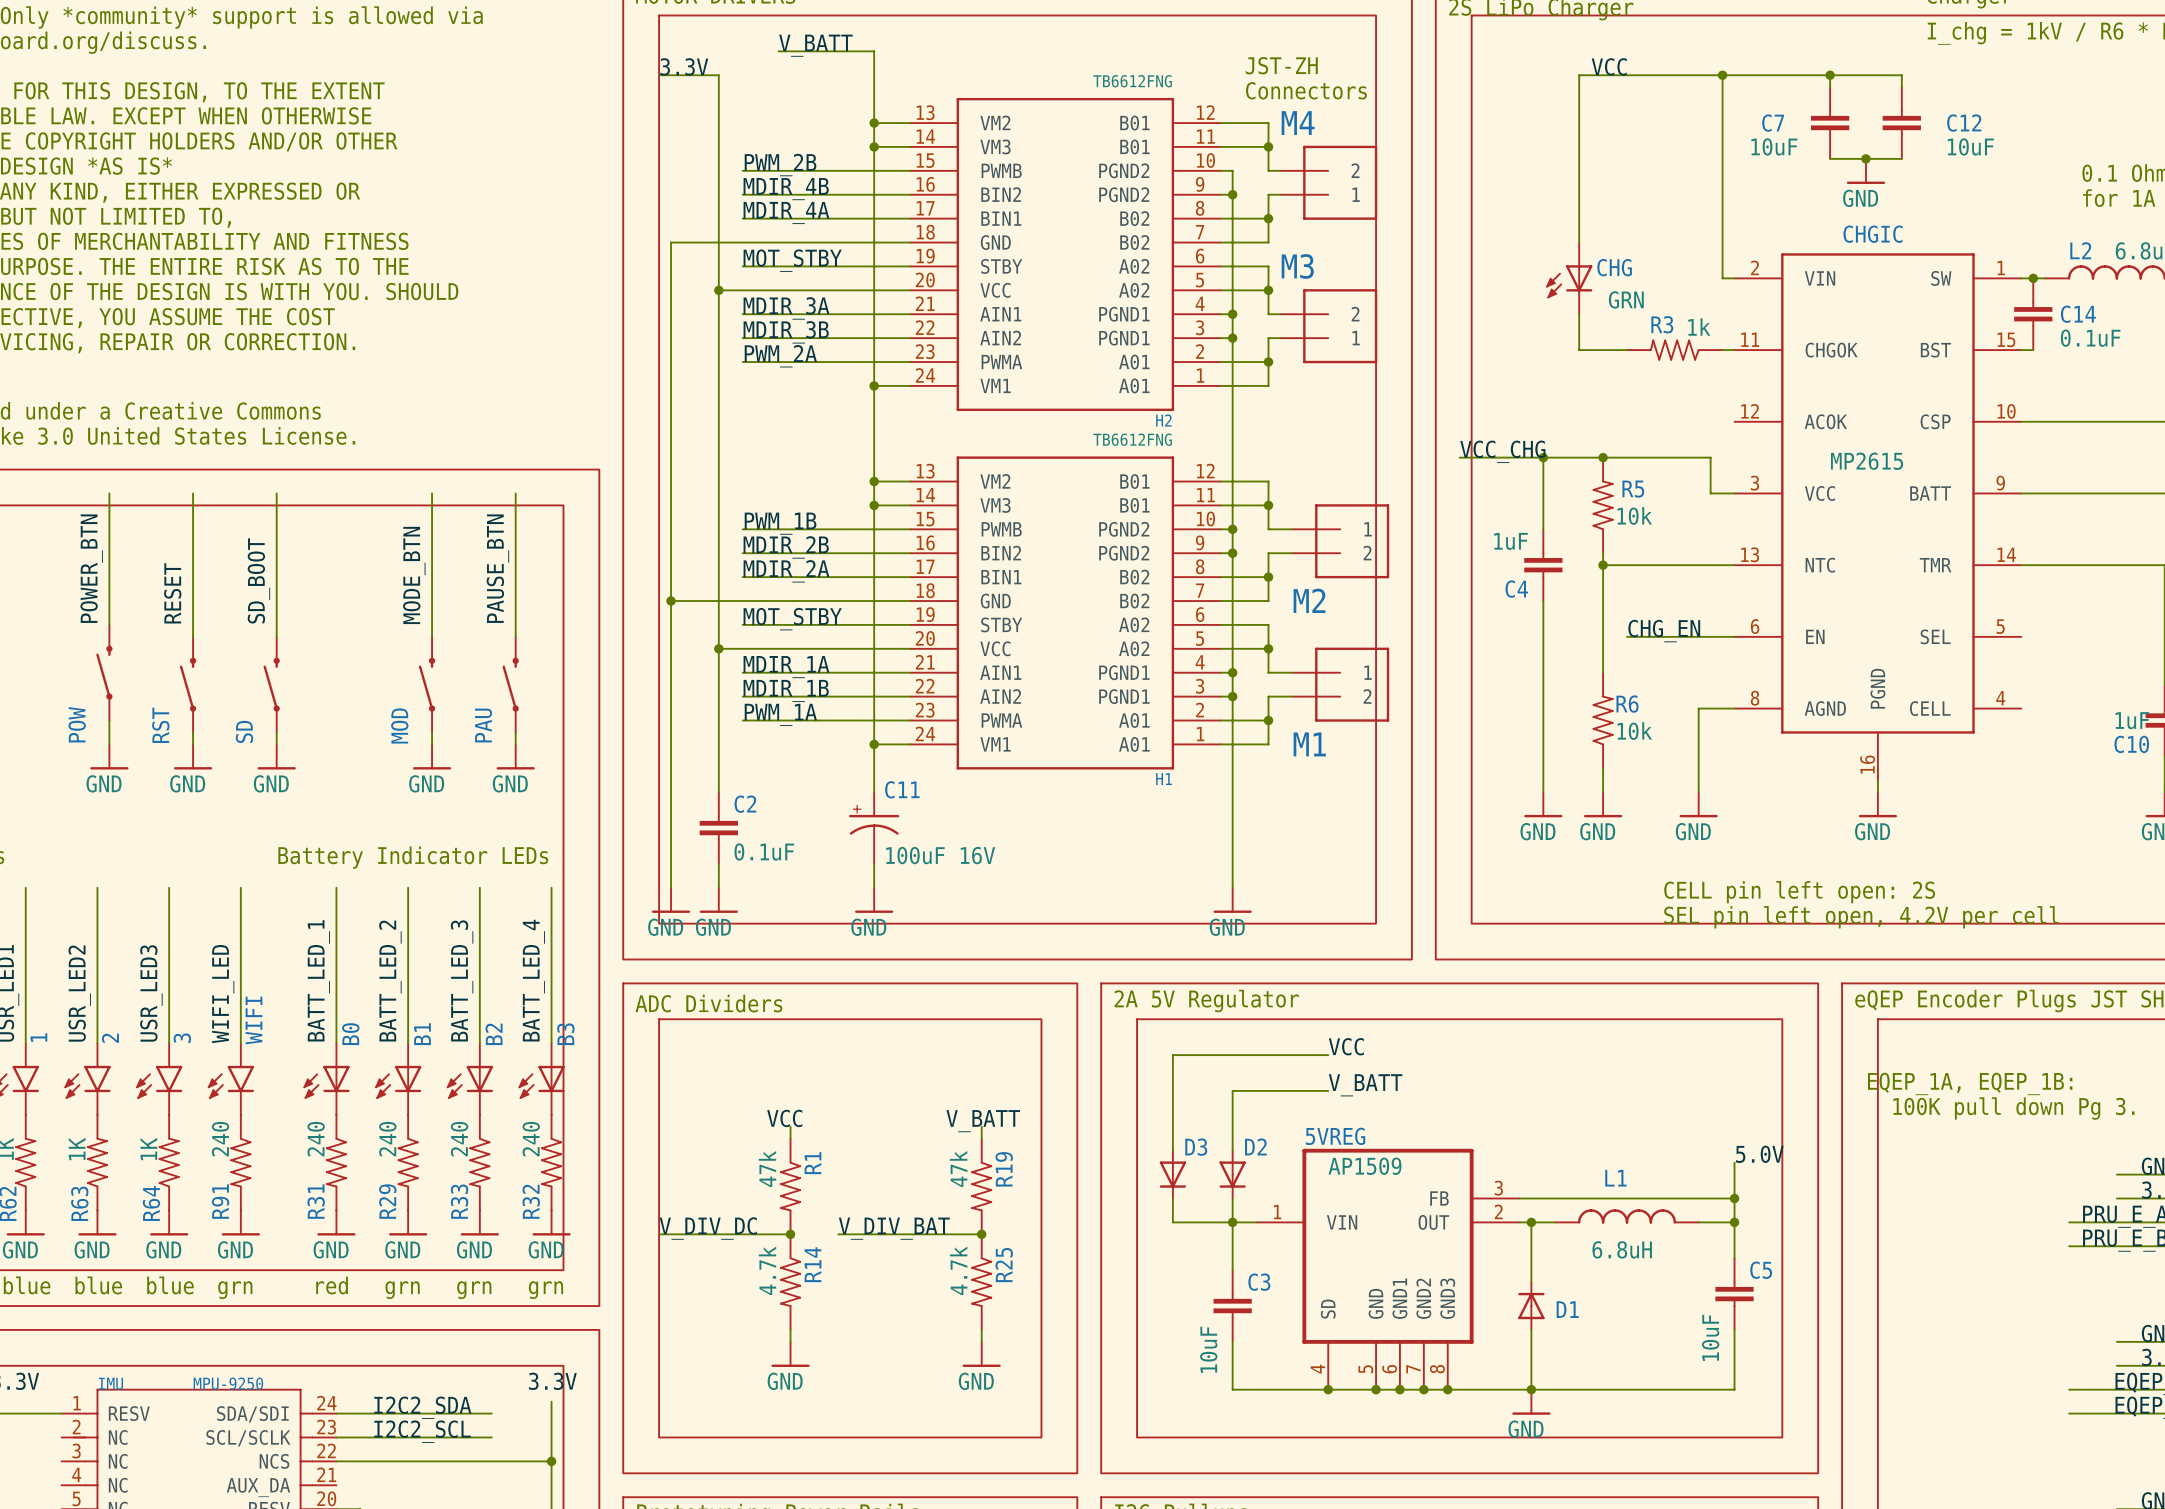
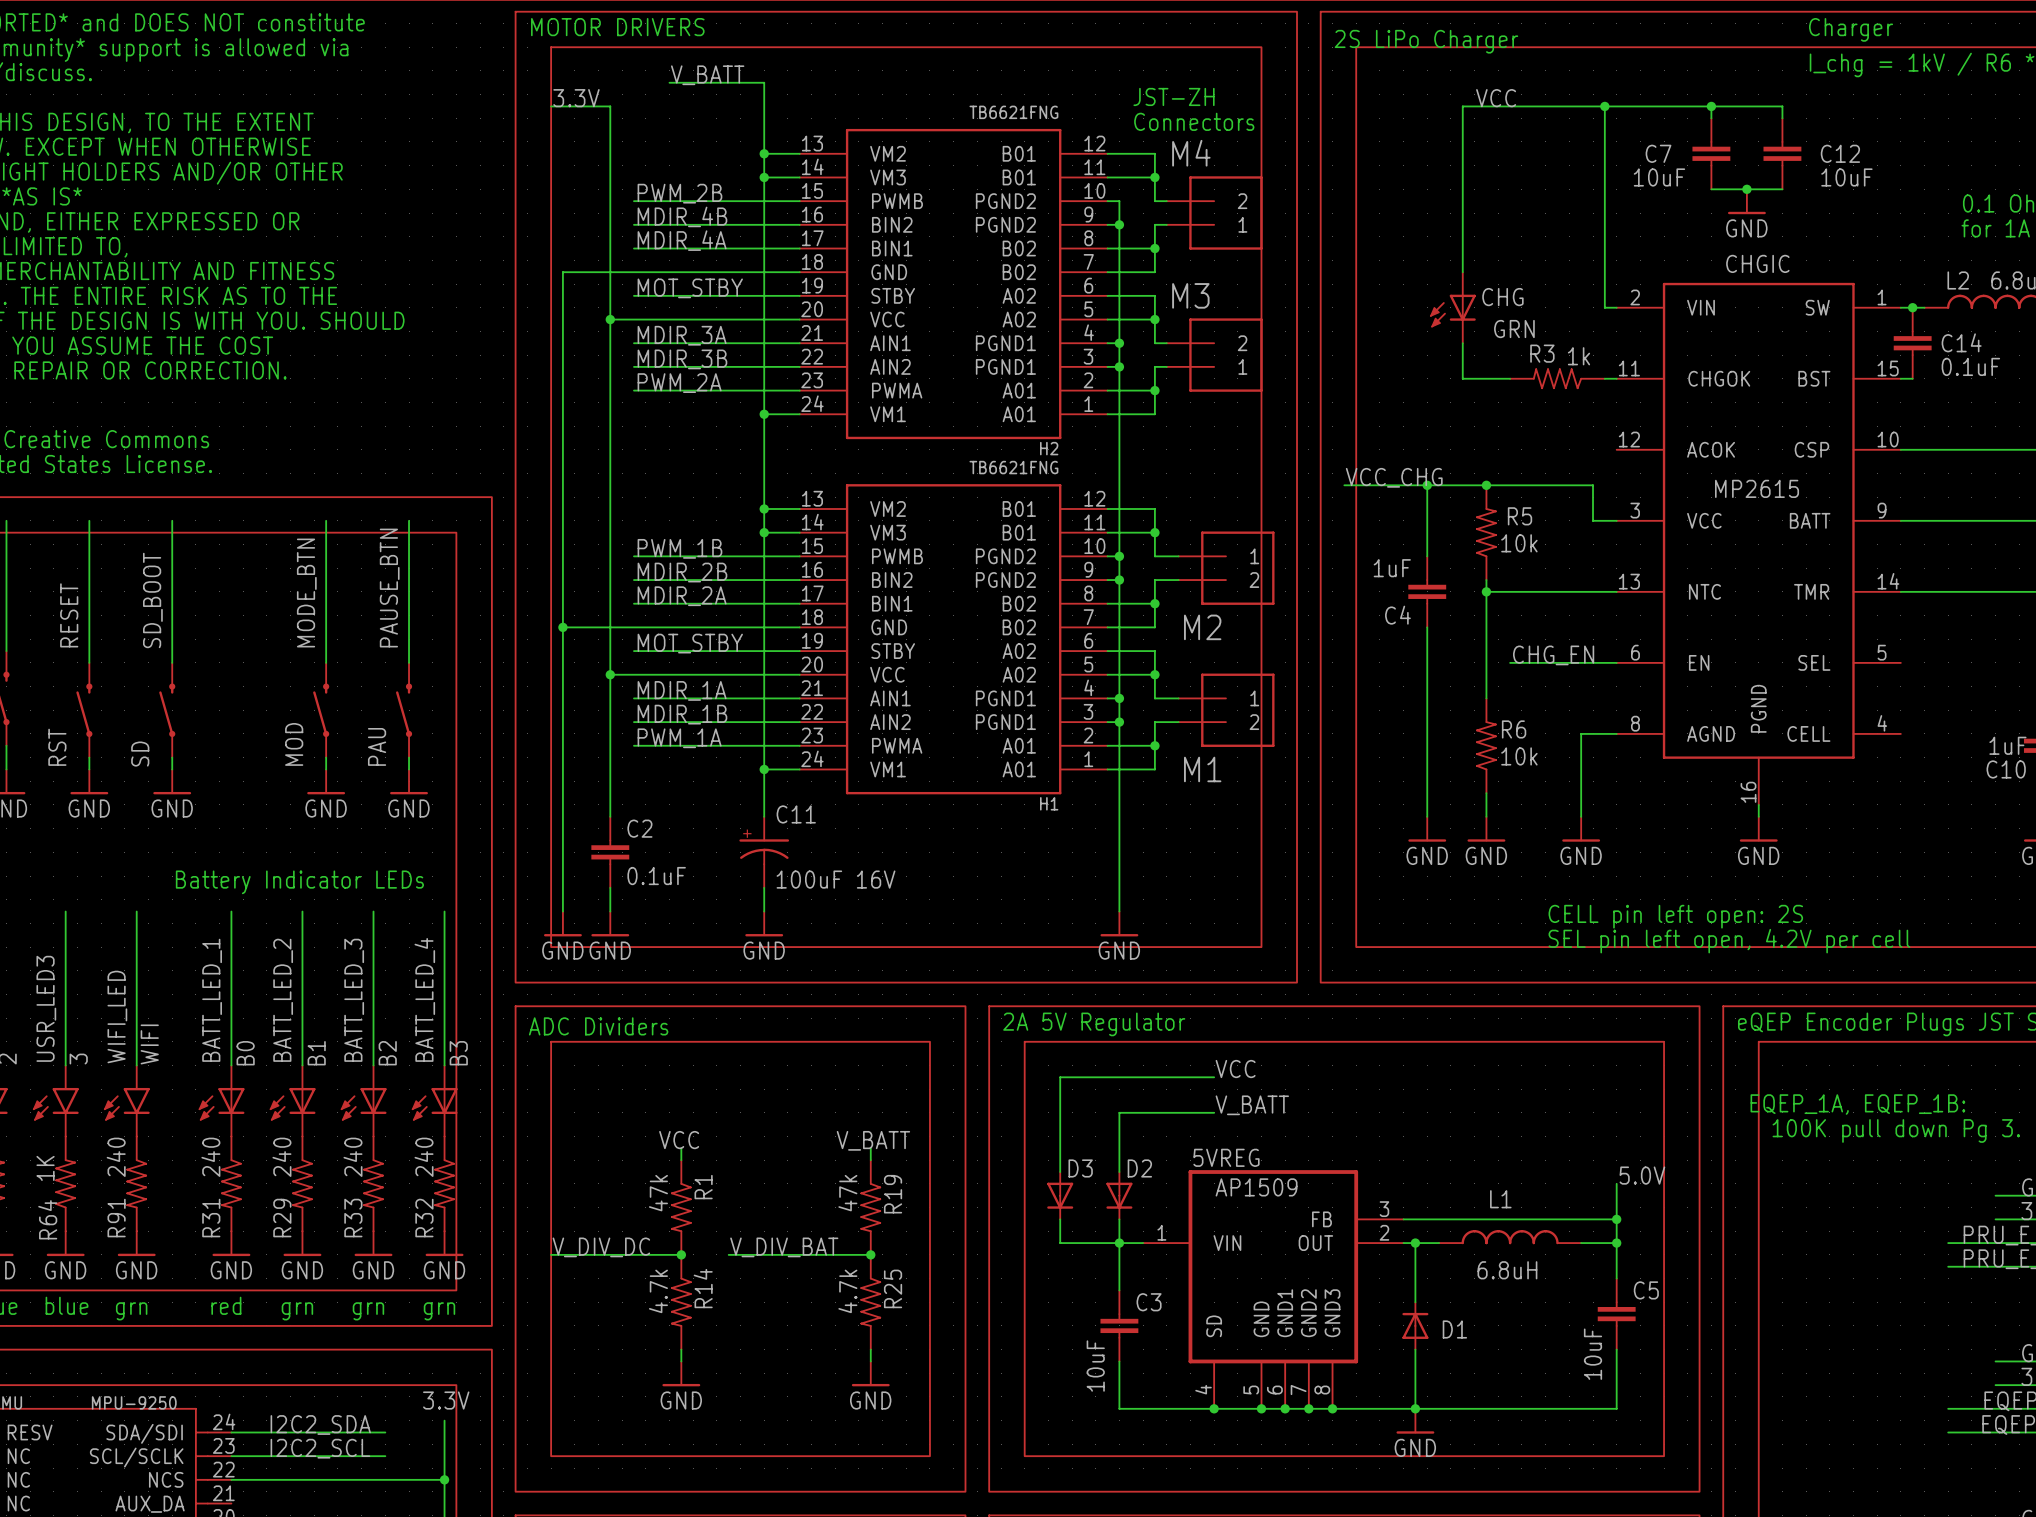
H2 value: TB6612FNG (1132, 81) -> TB6621FNG (1013, 112)
H1 value: TB6612FNG (1132, 439) -> TB6621FNG (1013, 467)

